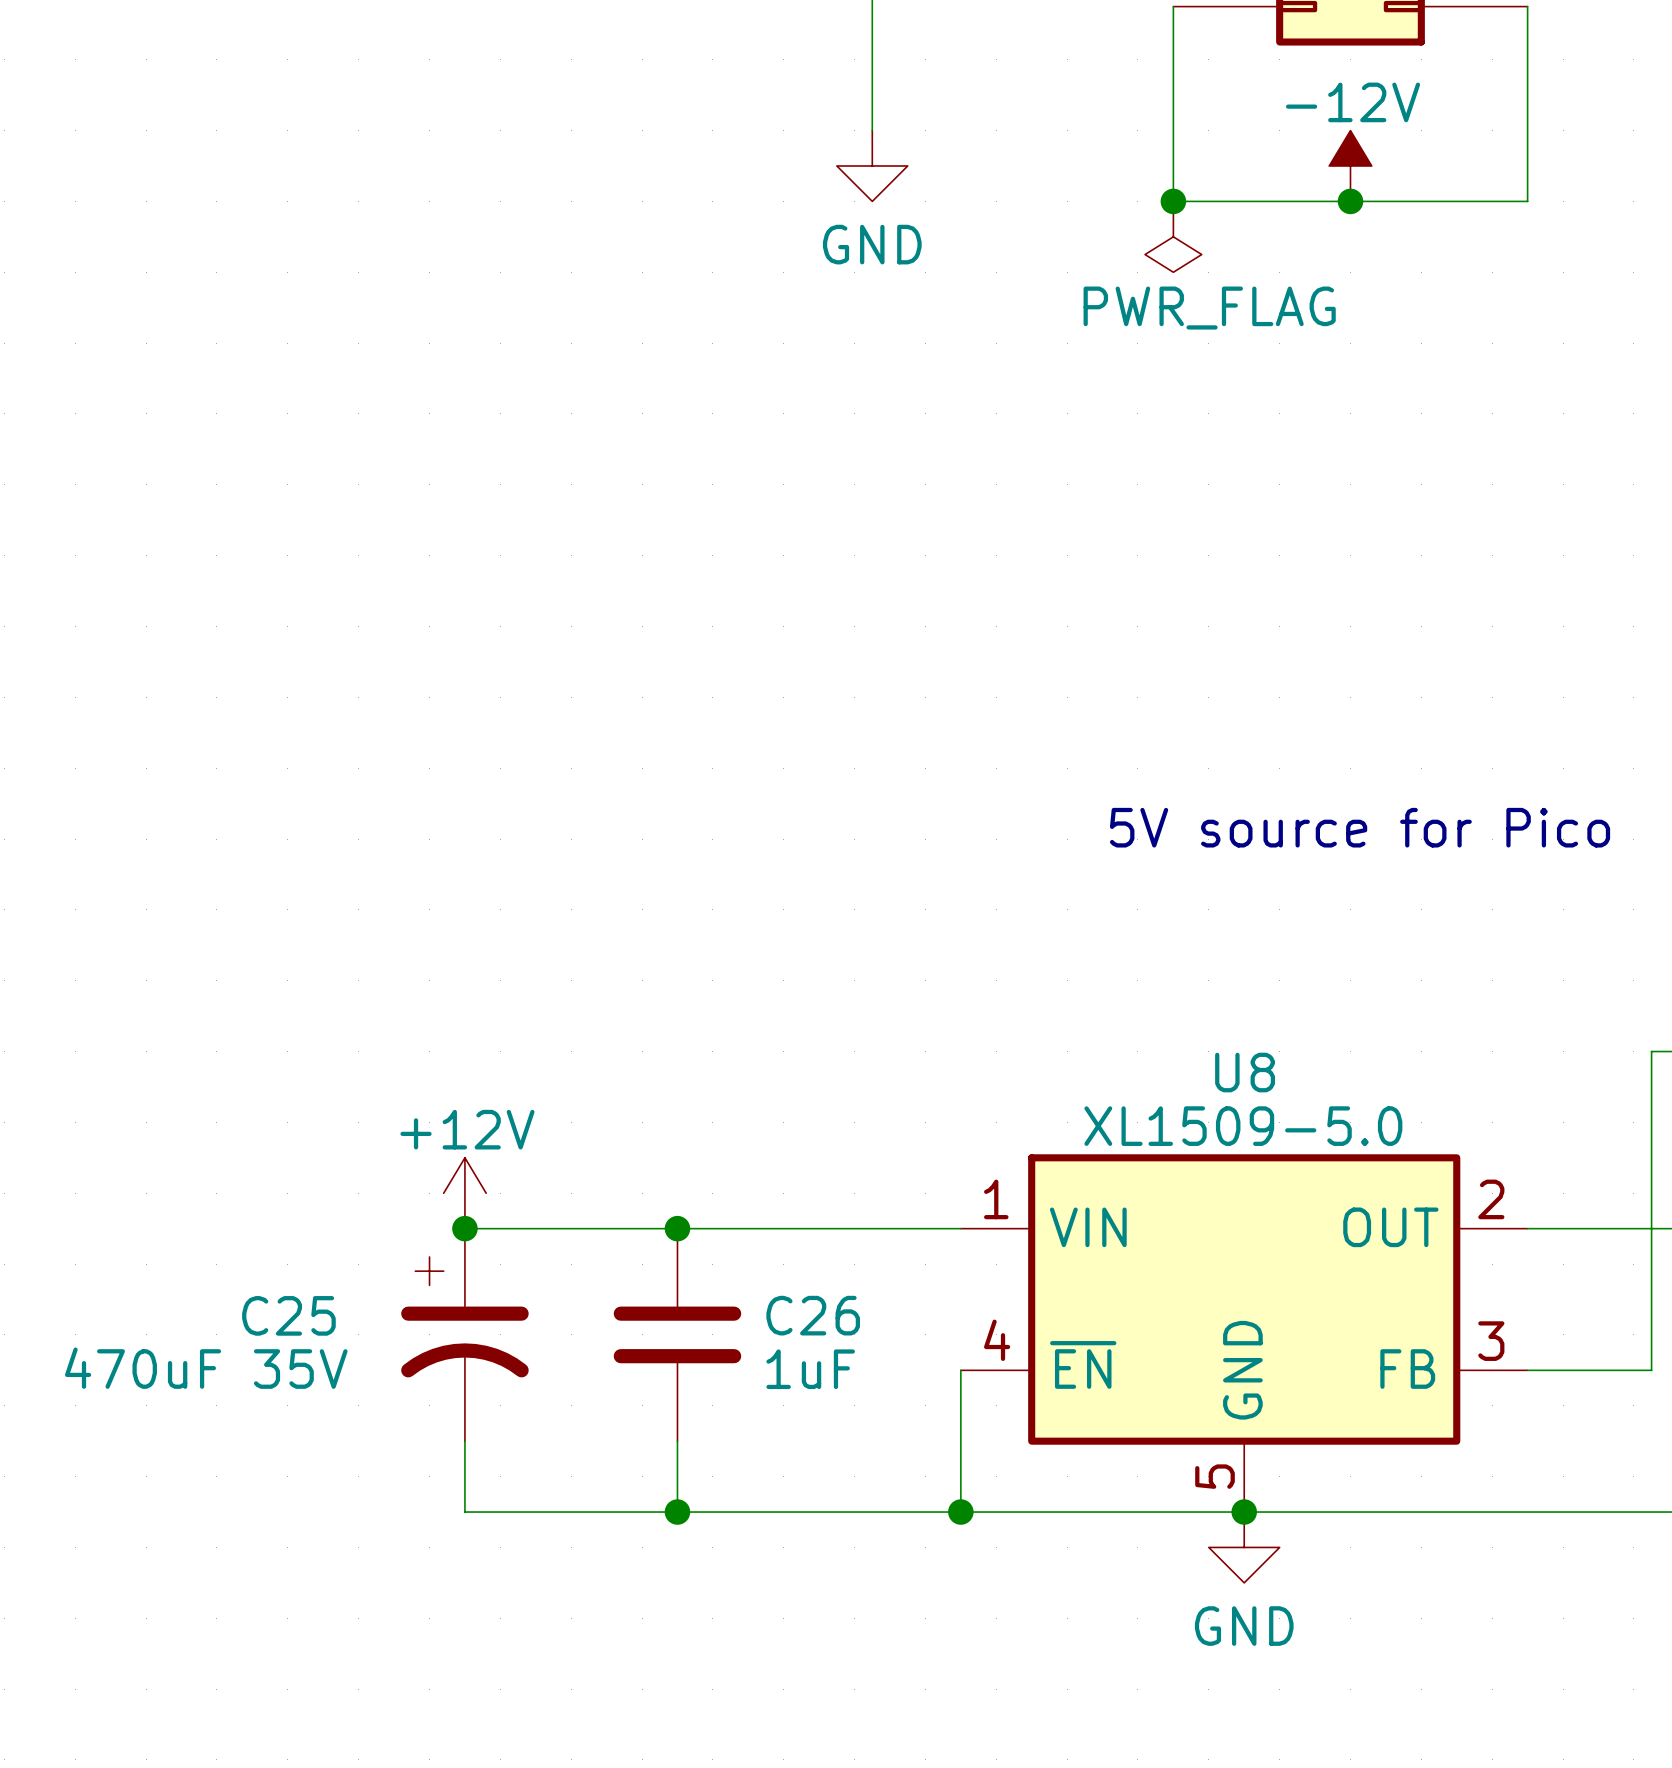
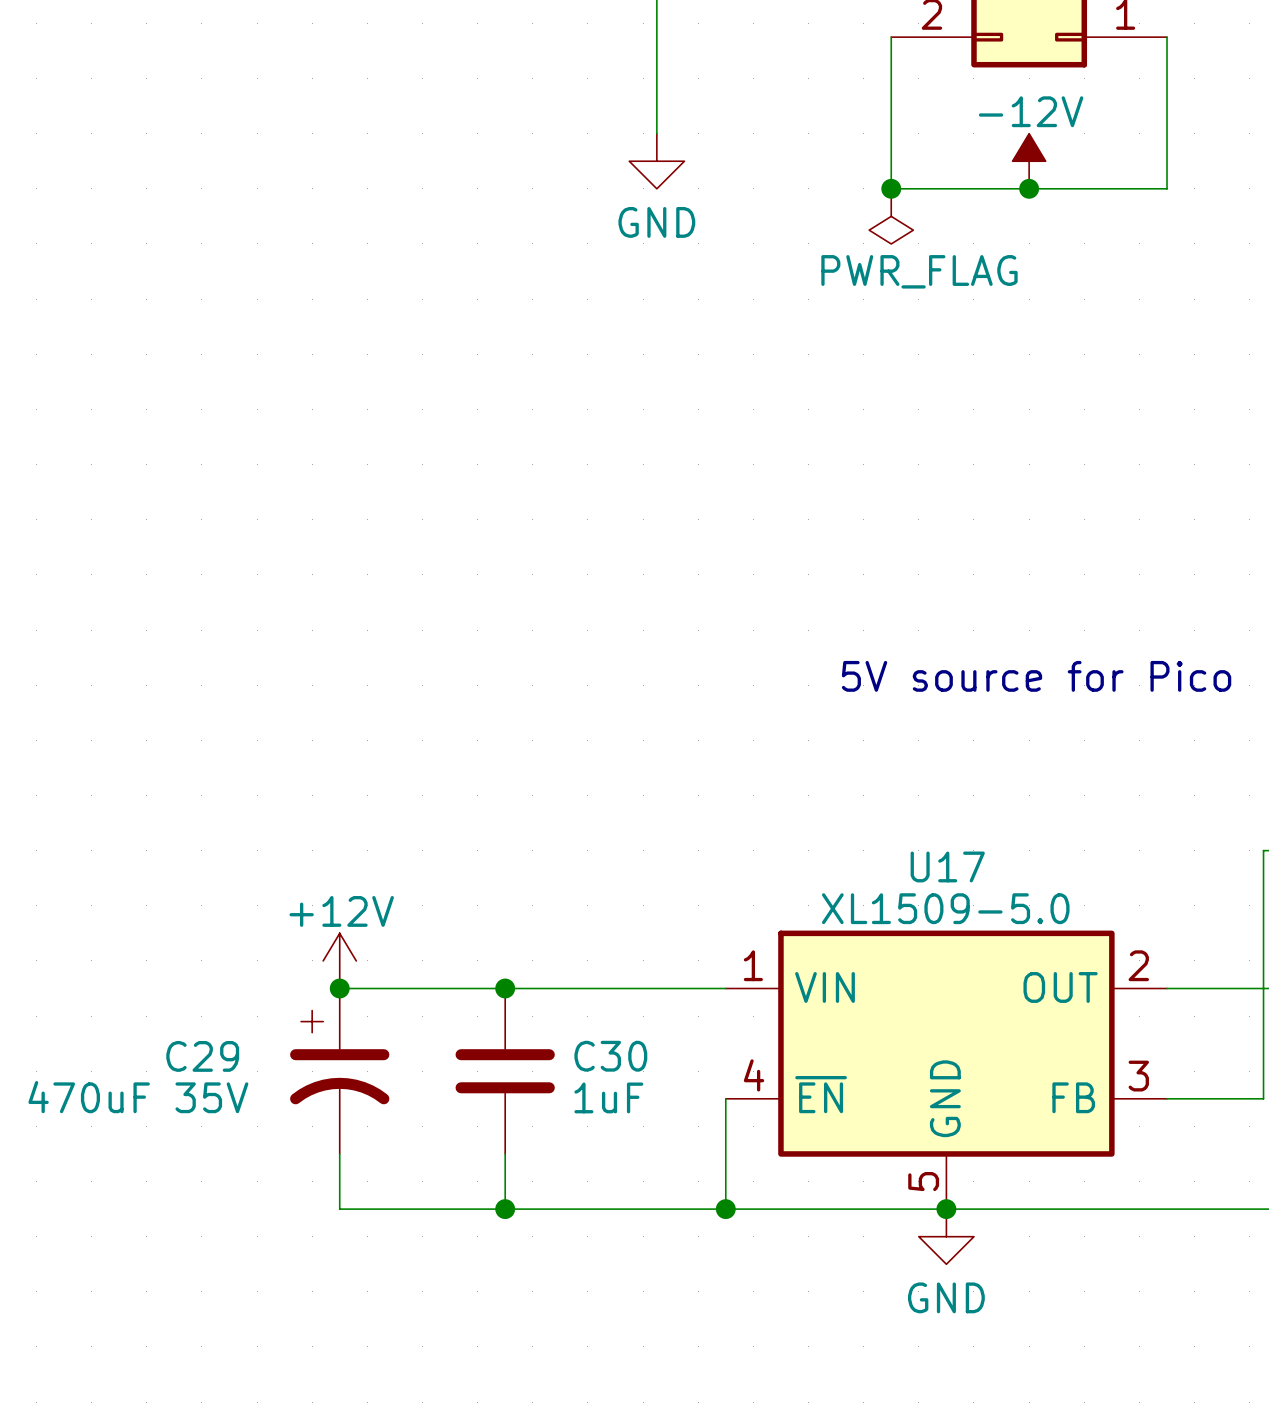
U8 name: U8 (1245, 1072) -> U17 (947, 866)
C25 name: C25 (288, 1315) -> C29 (202, 1056)
C26 name: C26 (813, 1315) -> C30 (610, 1056)

